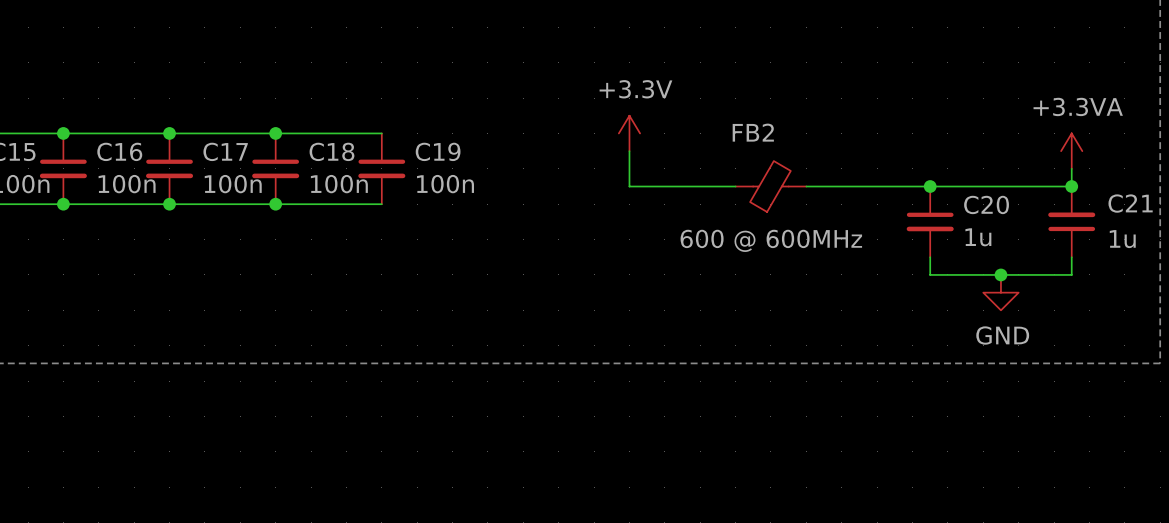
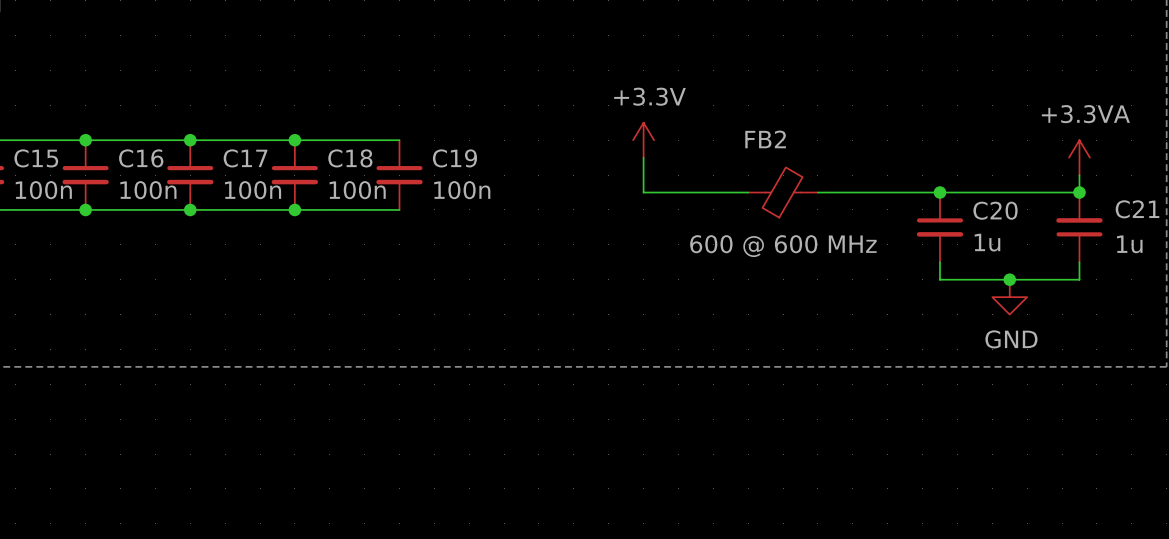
FB2 value: 600 @ 600MHz (771, 240) -> 600 @ 600 MHz (783, 246)

